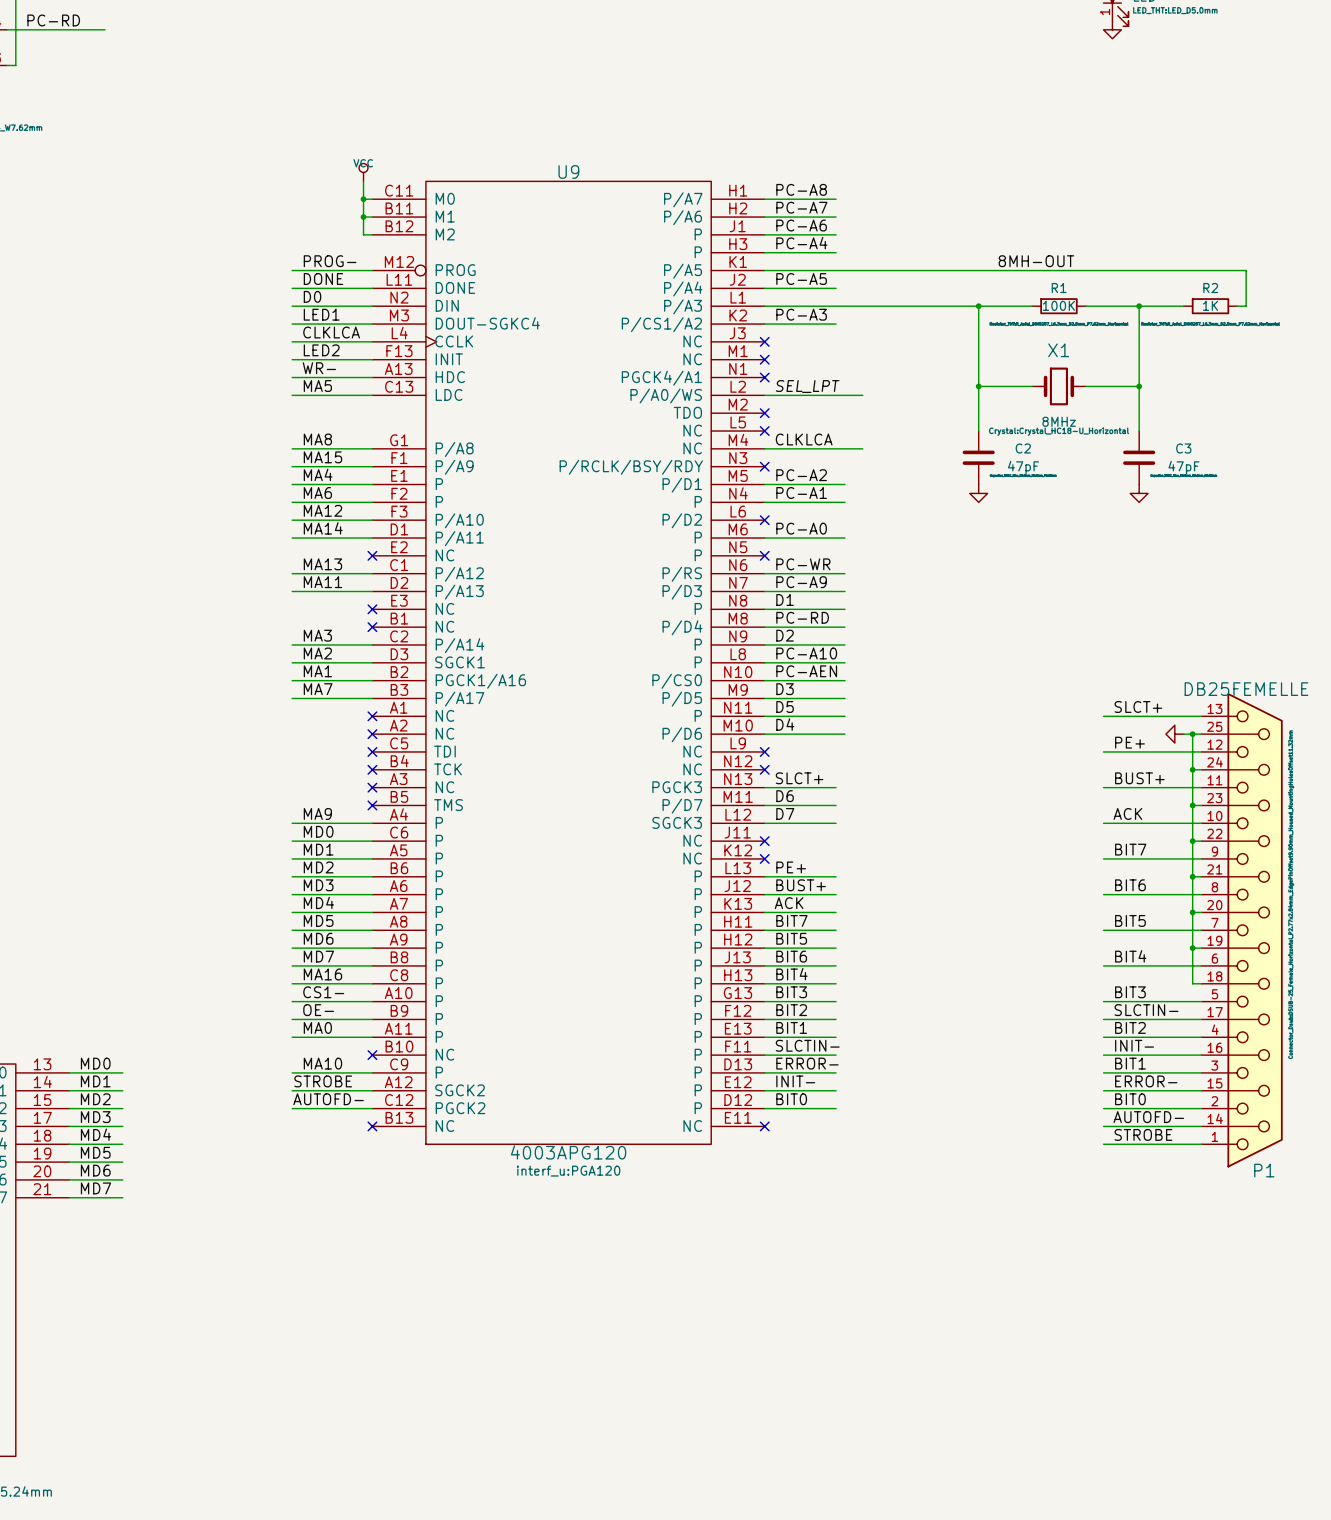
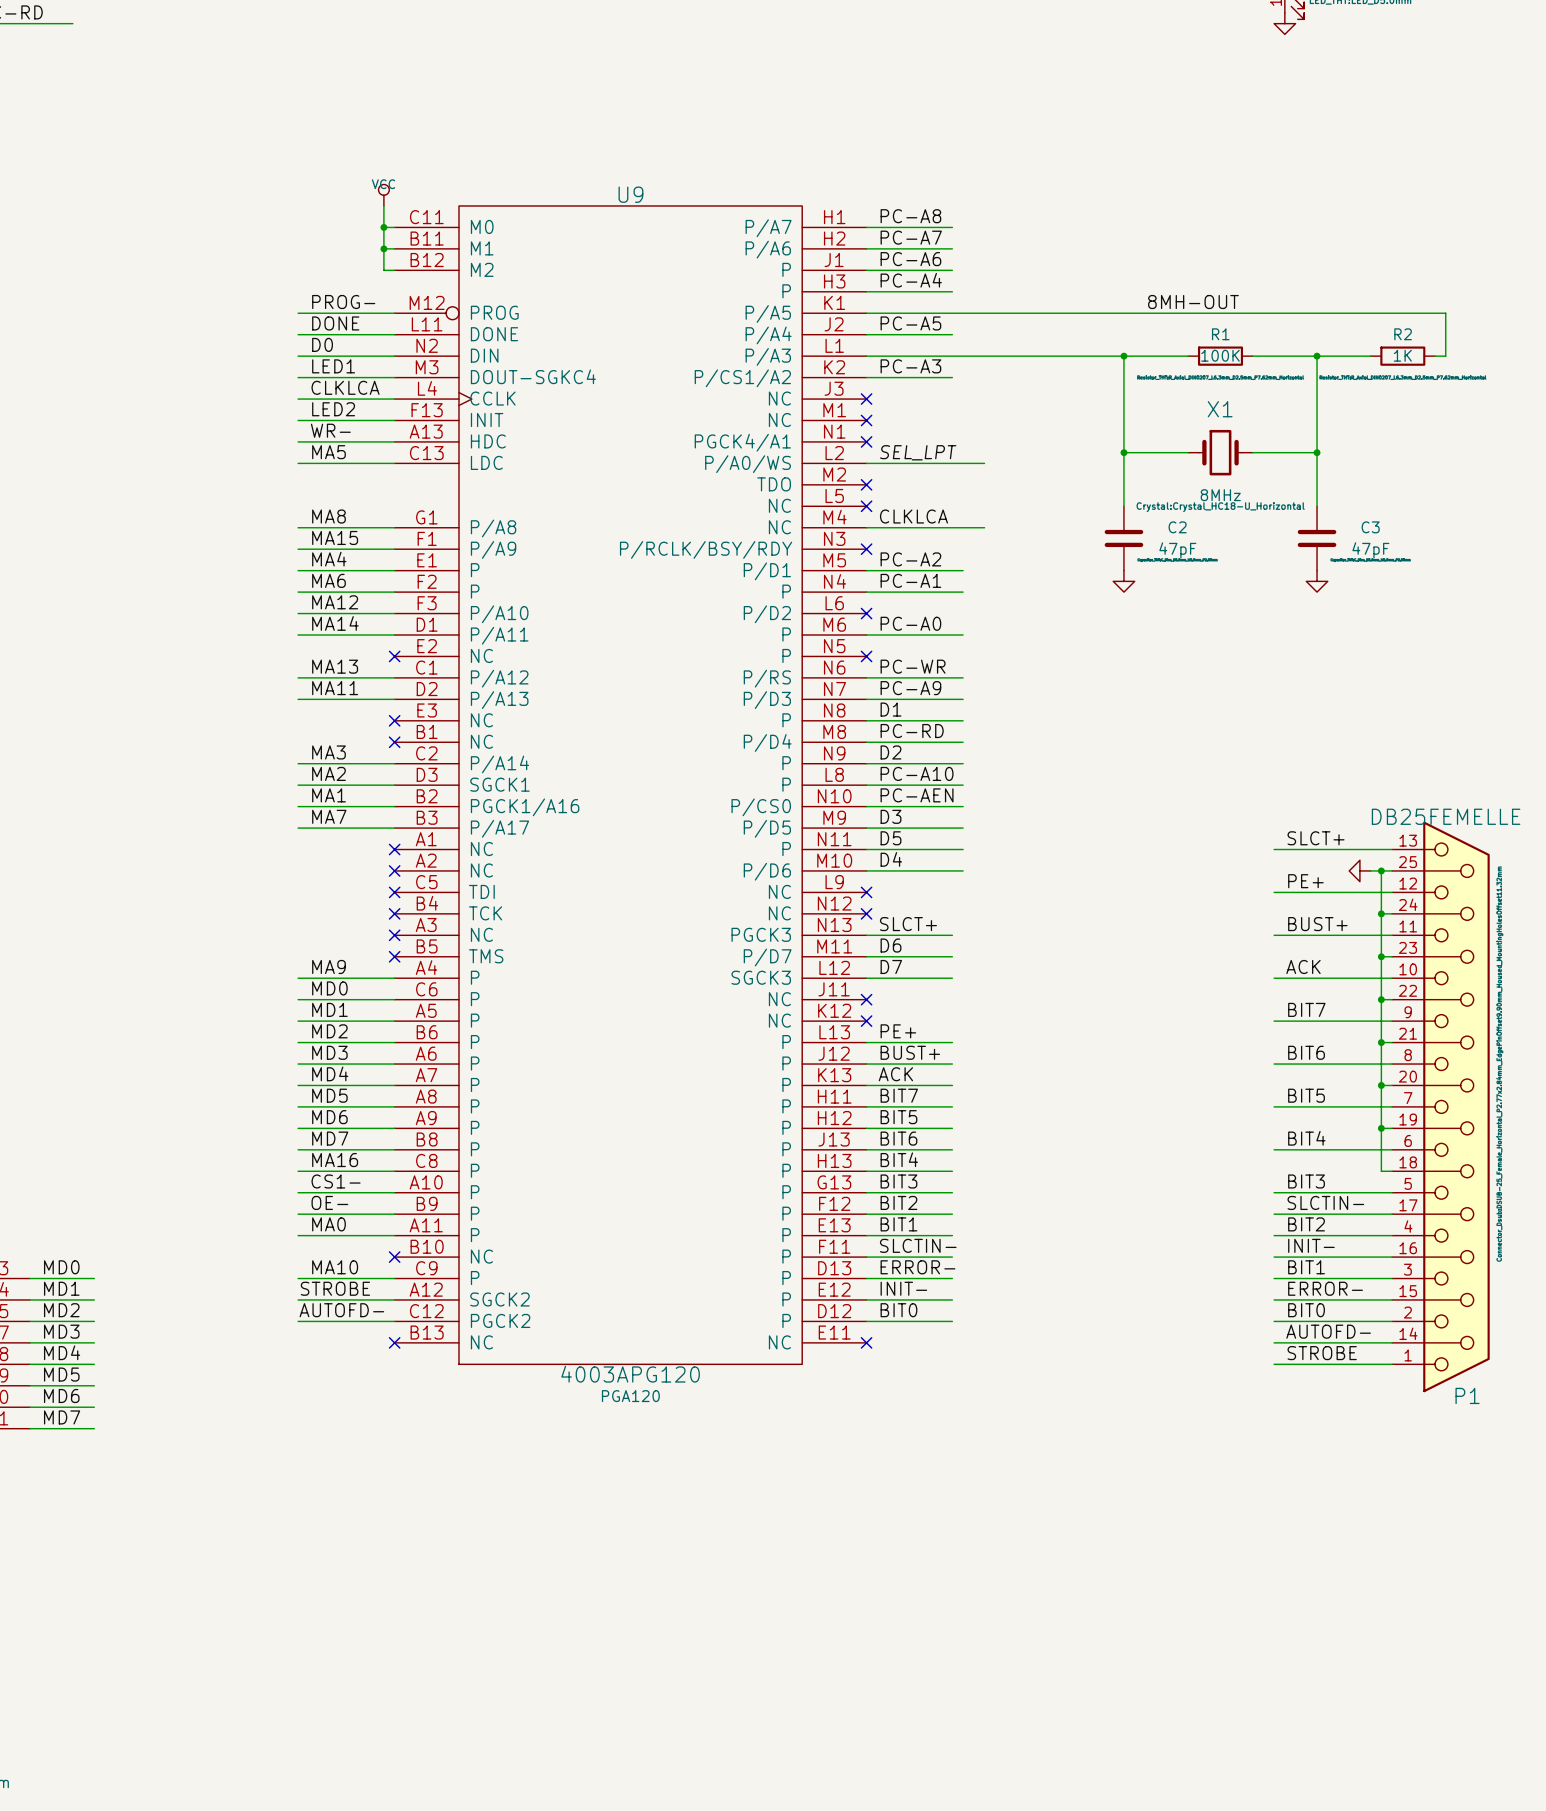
U9 text: interf_u:PGA120 (568, 1171) -> PGA120 (630, 1396)

